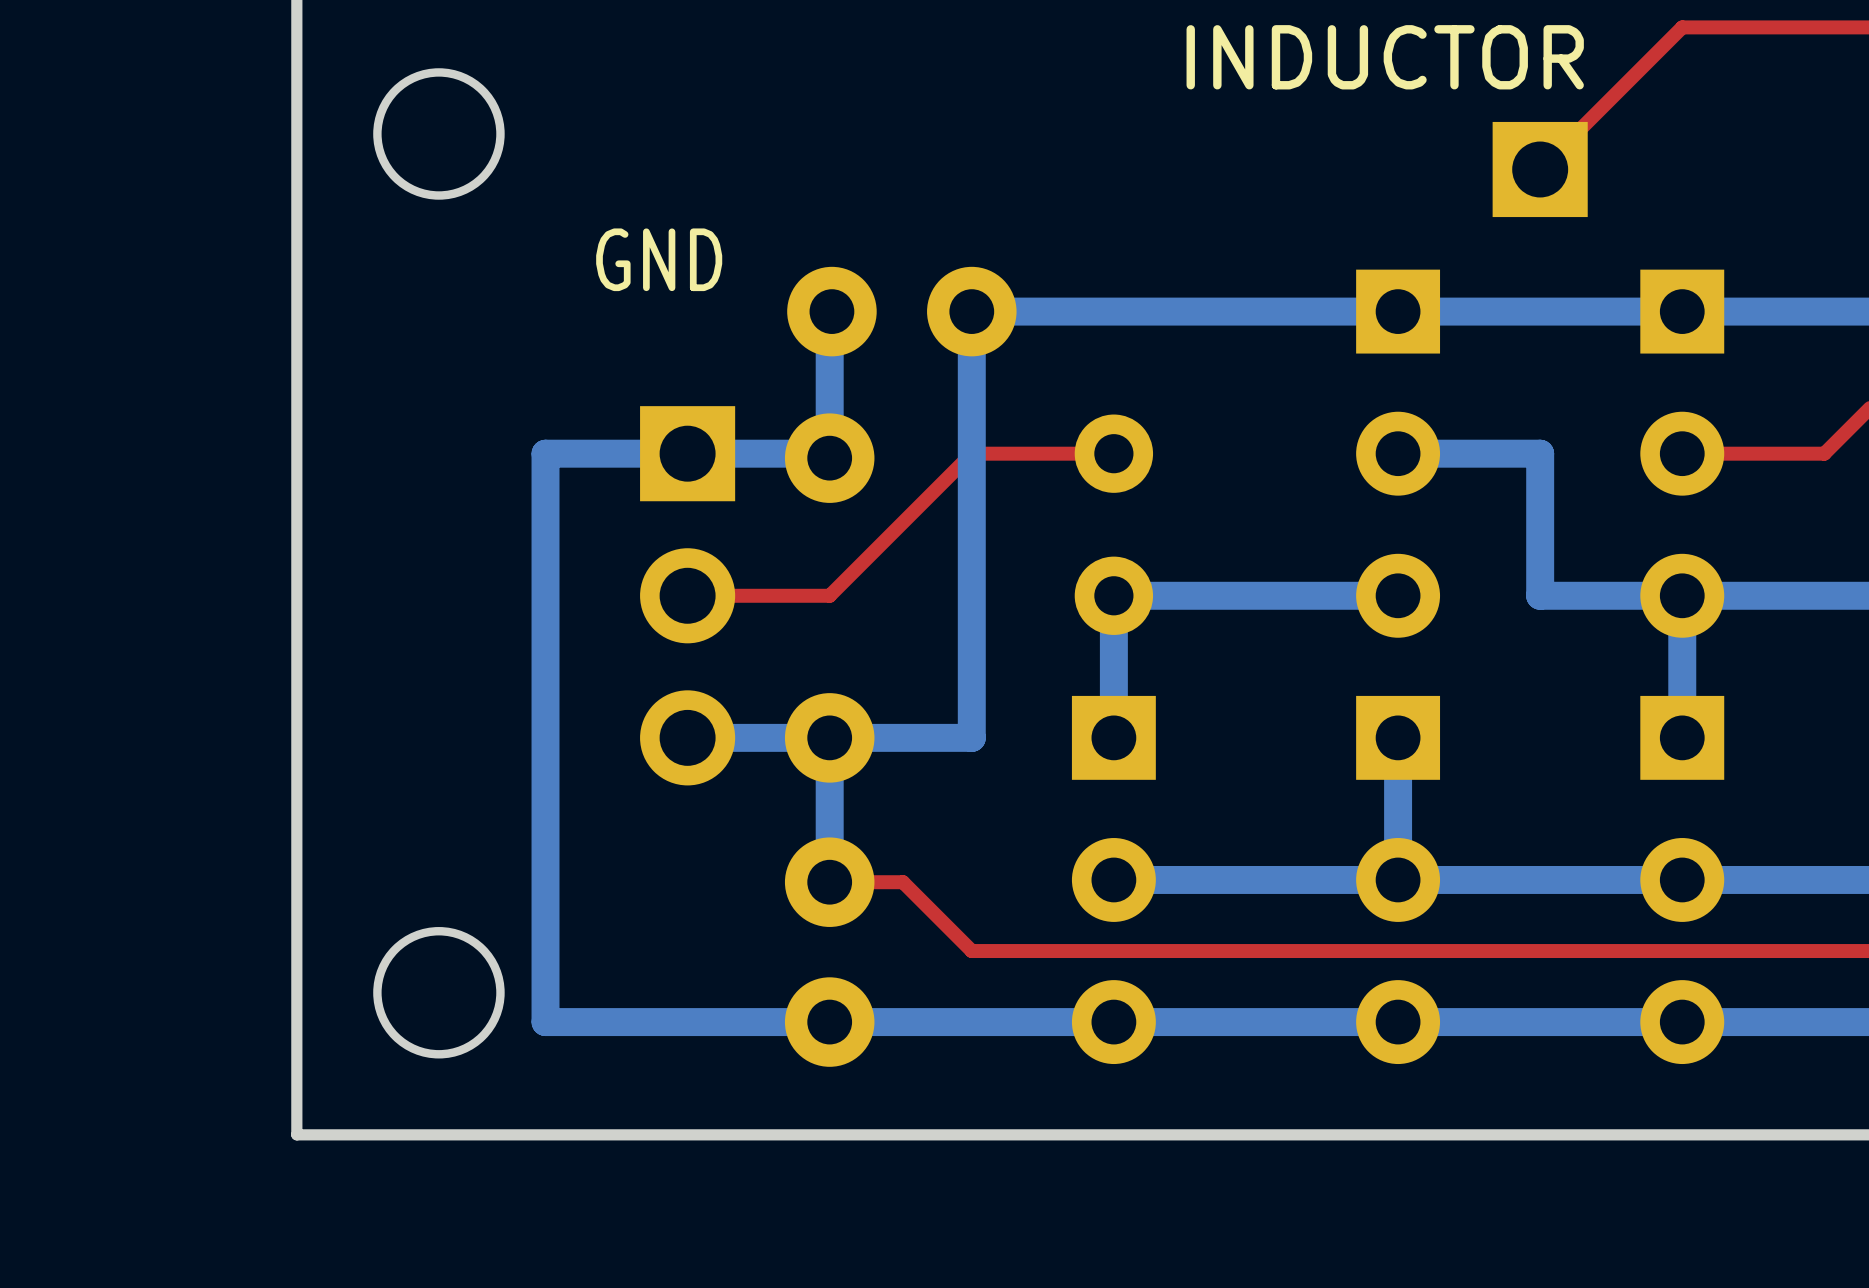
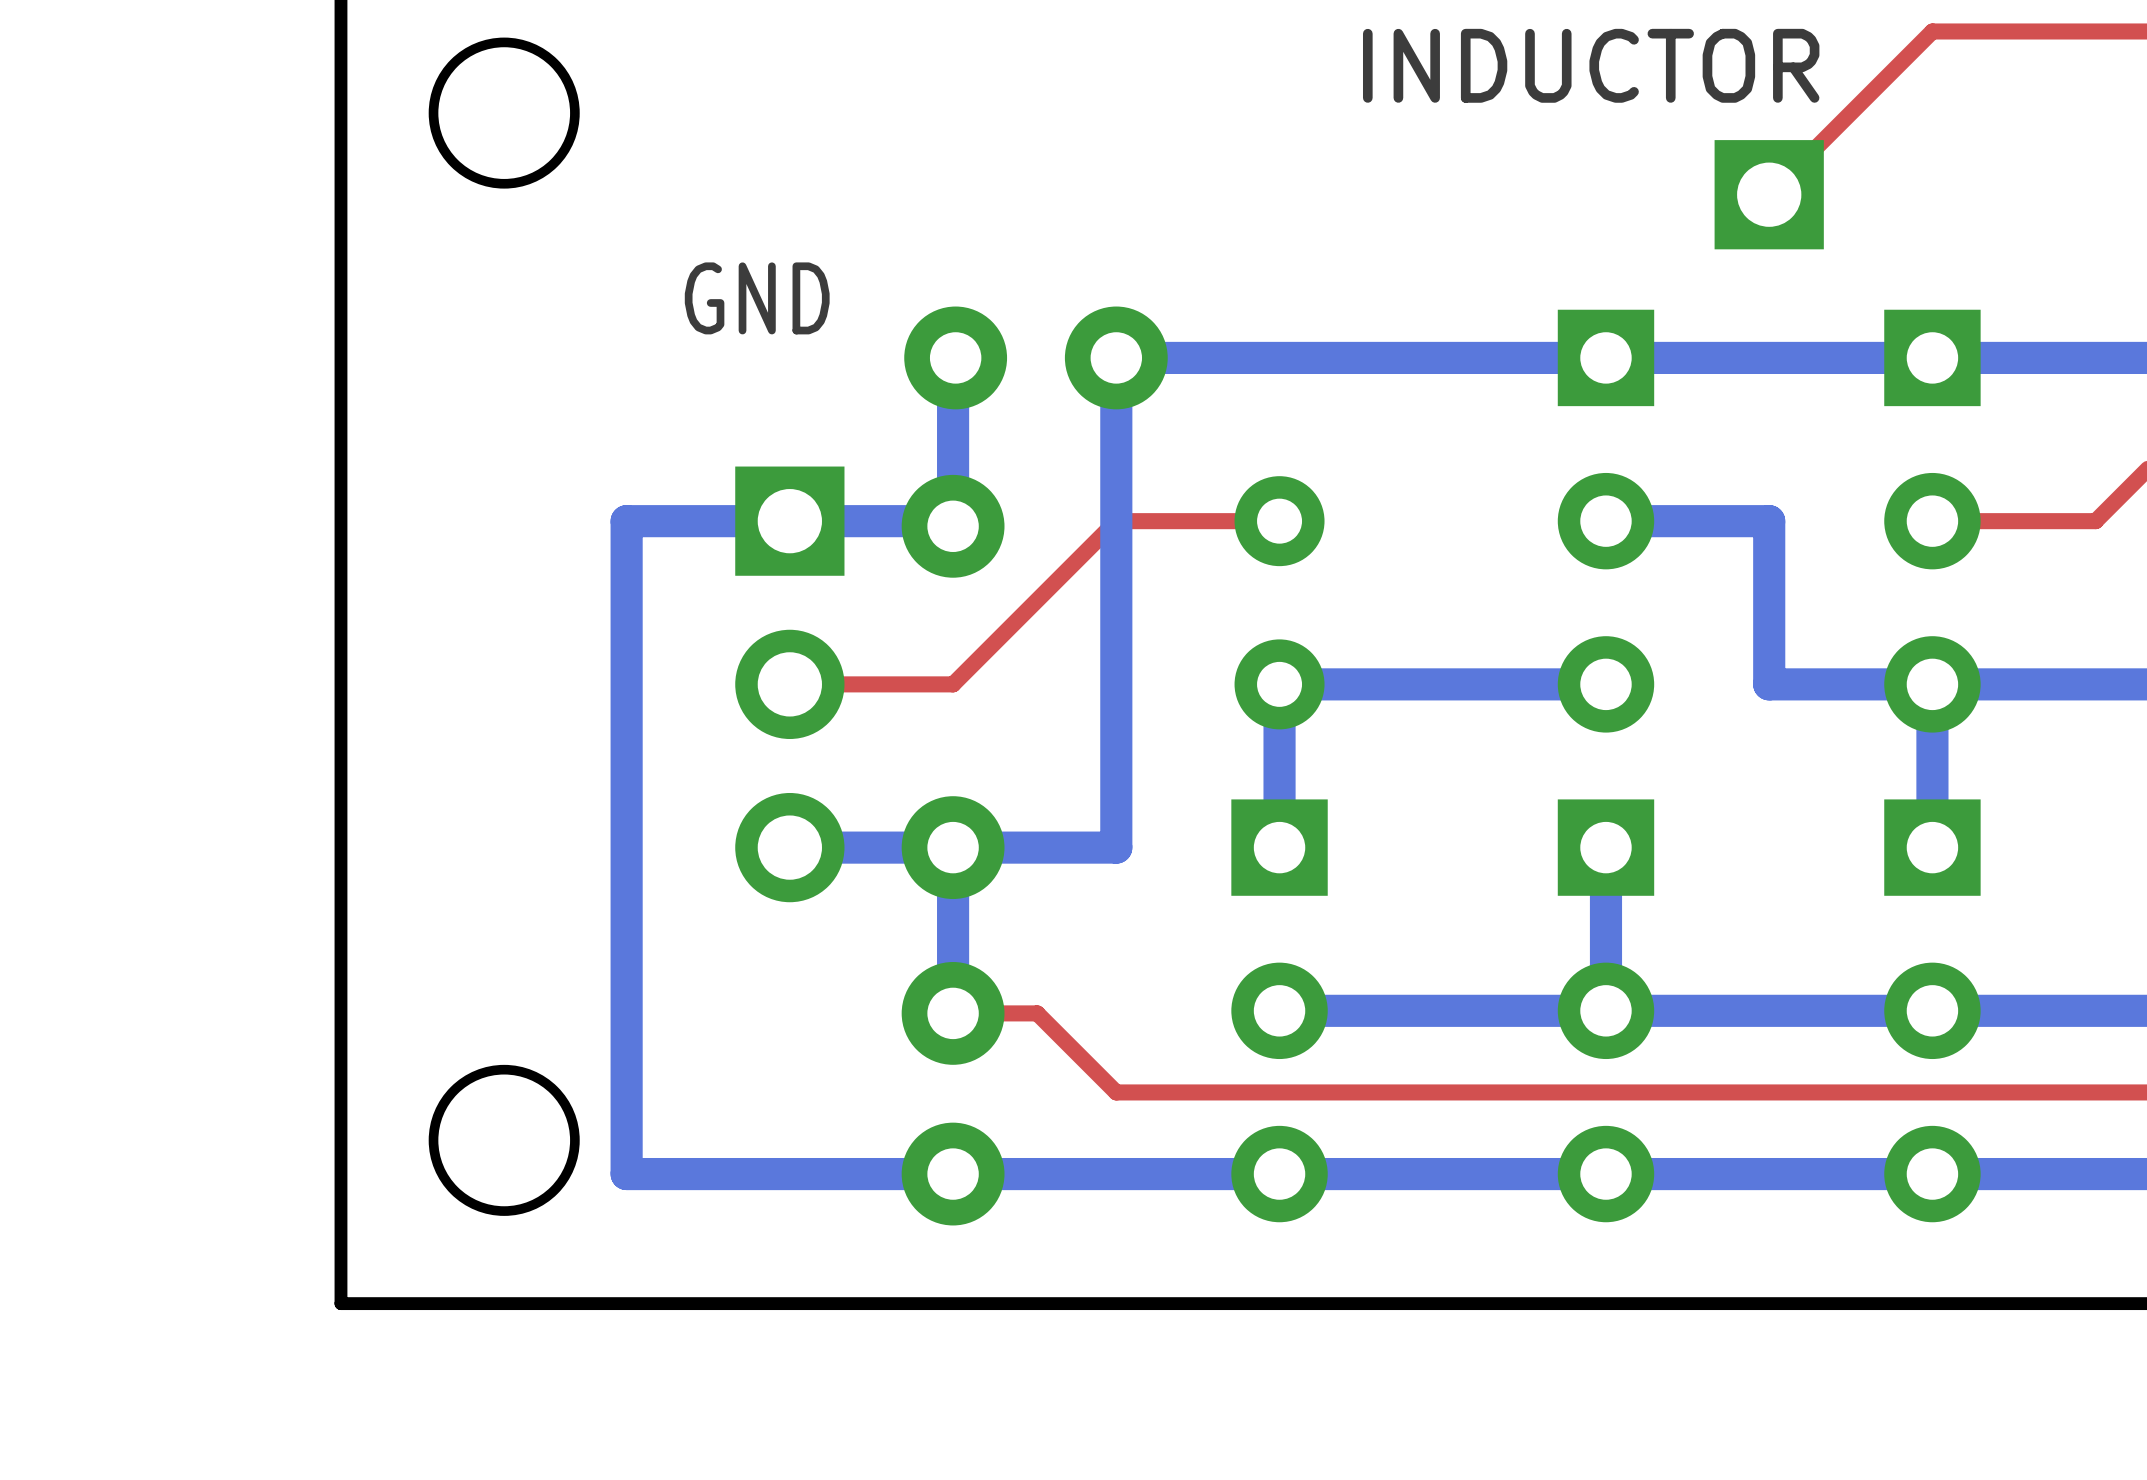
round board edge position: (438, 133) -> (504, 113)

